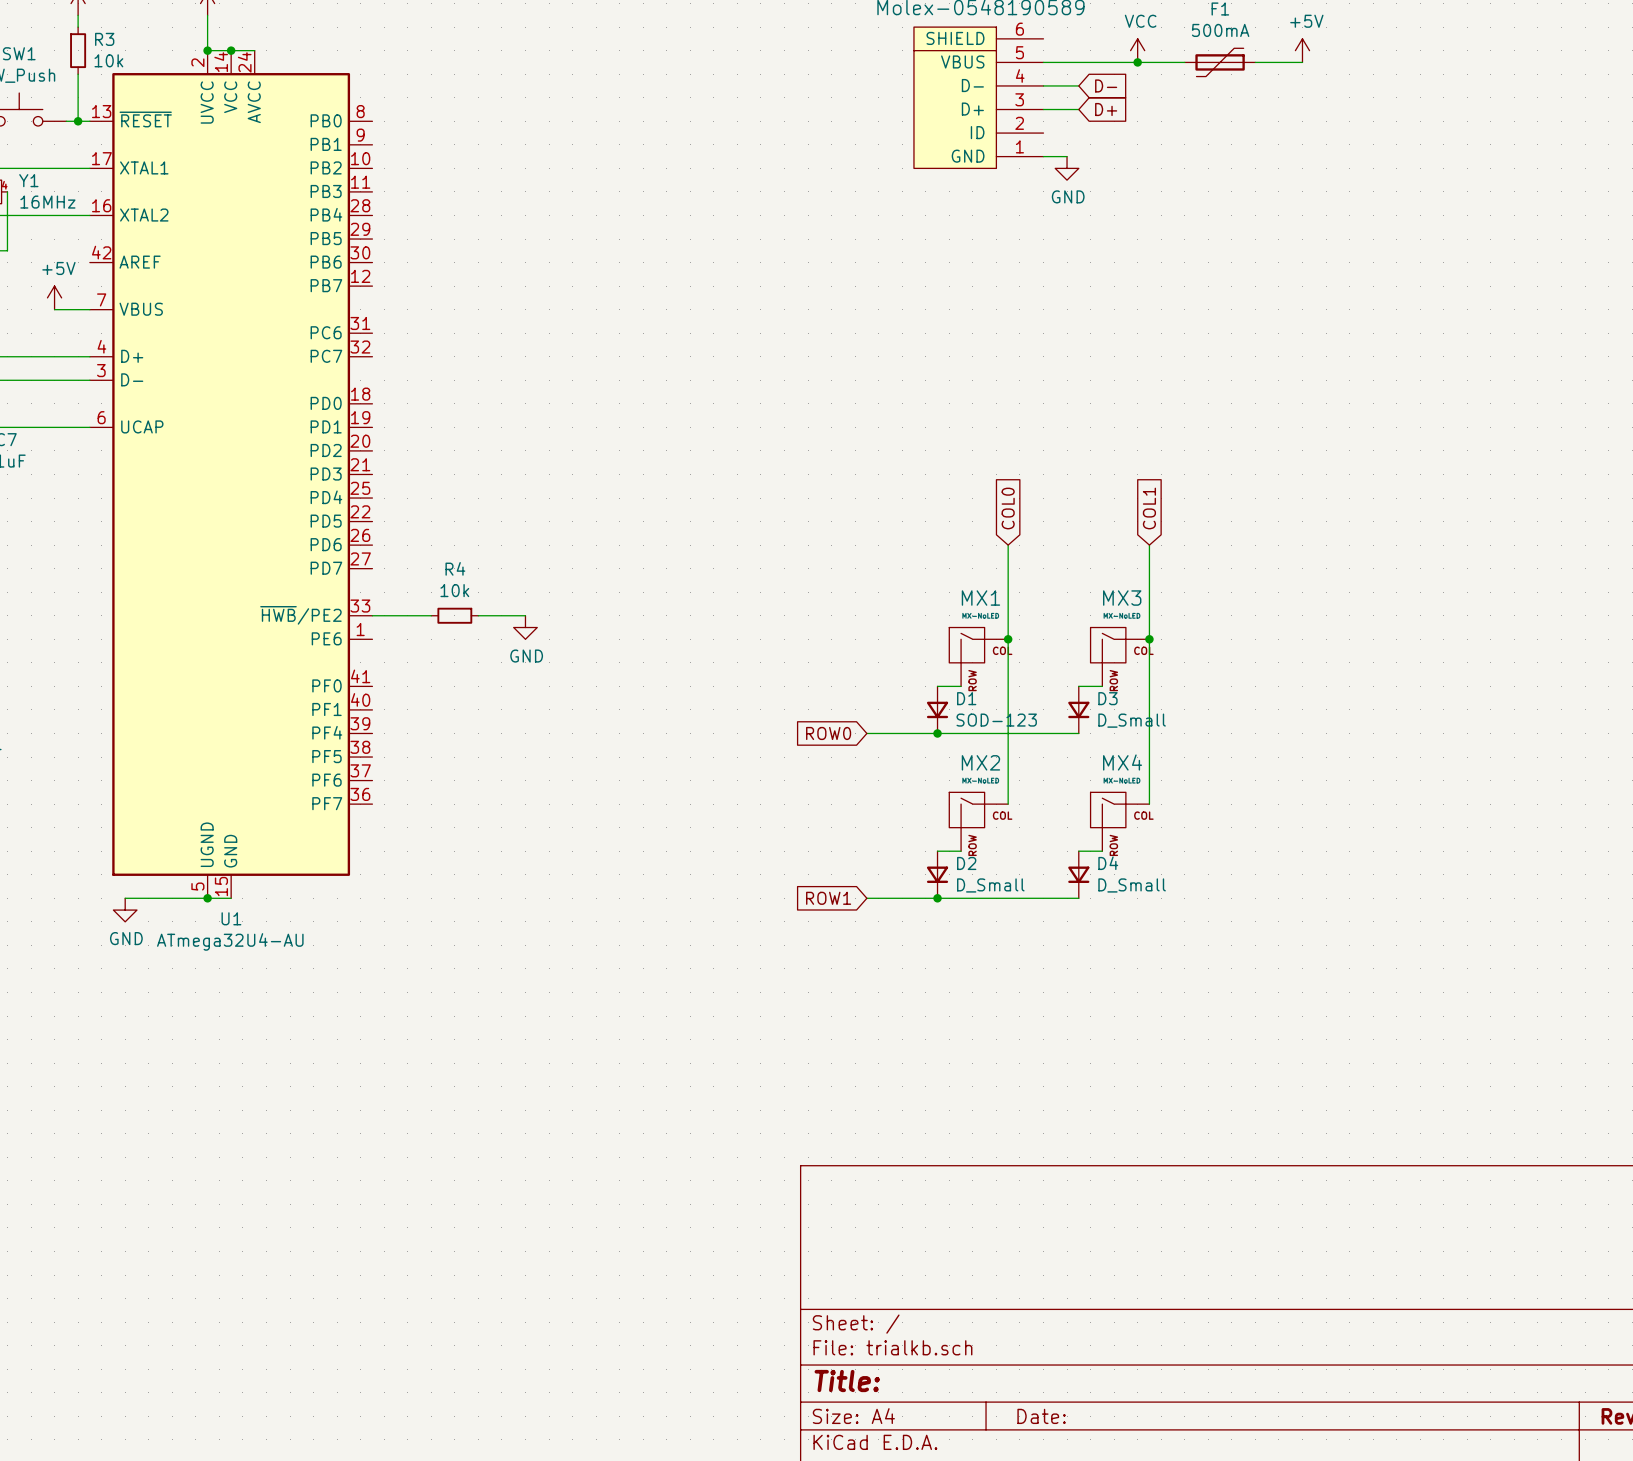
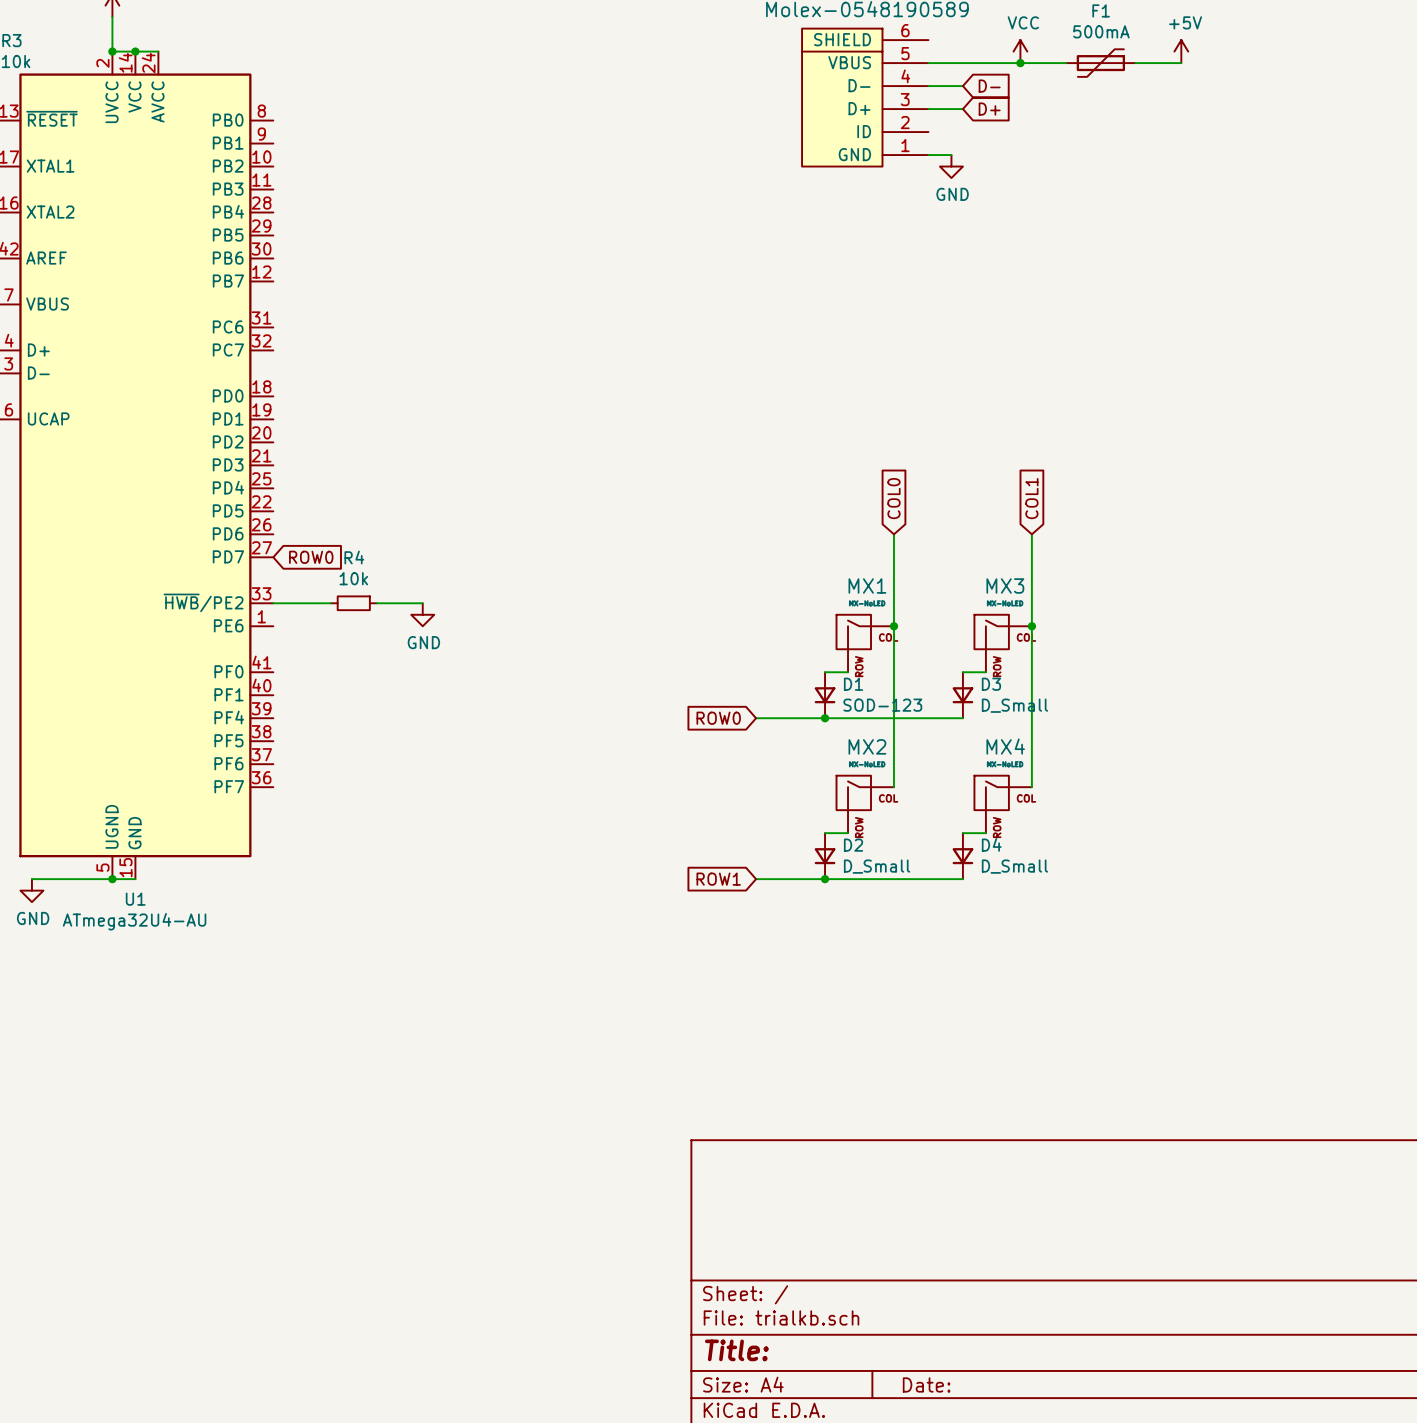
global label: none -> ROW0 (311, 557)

